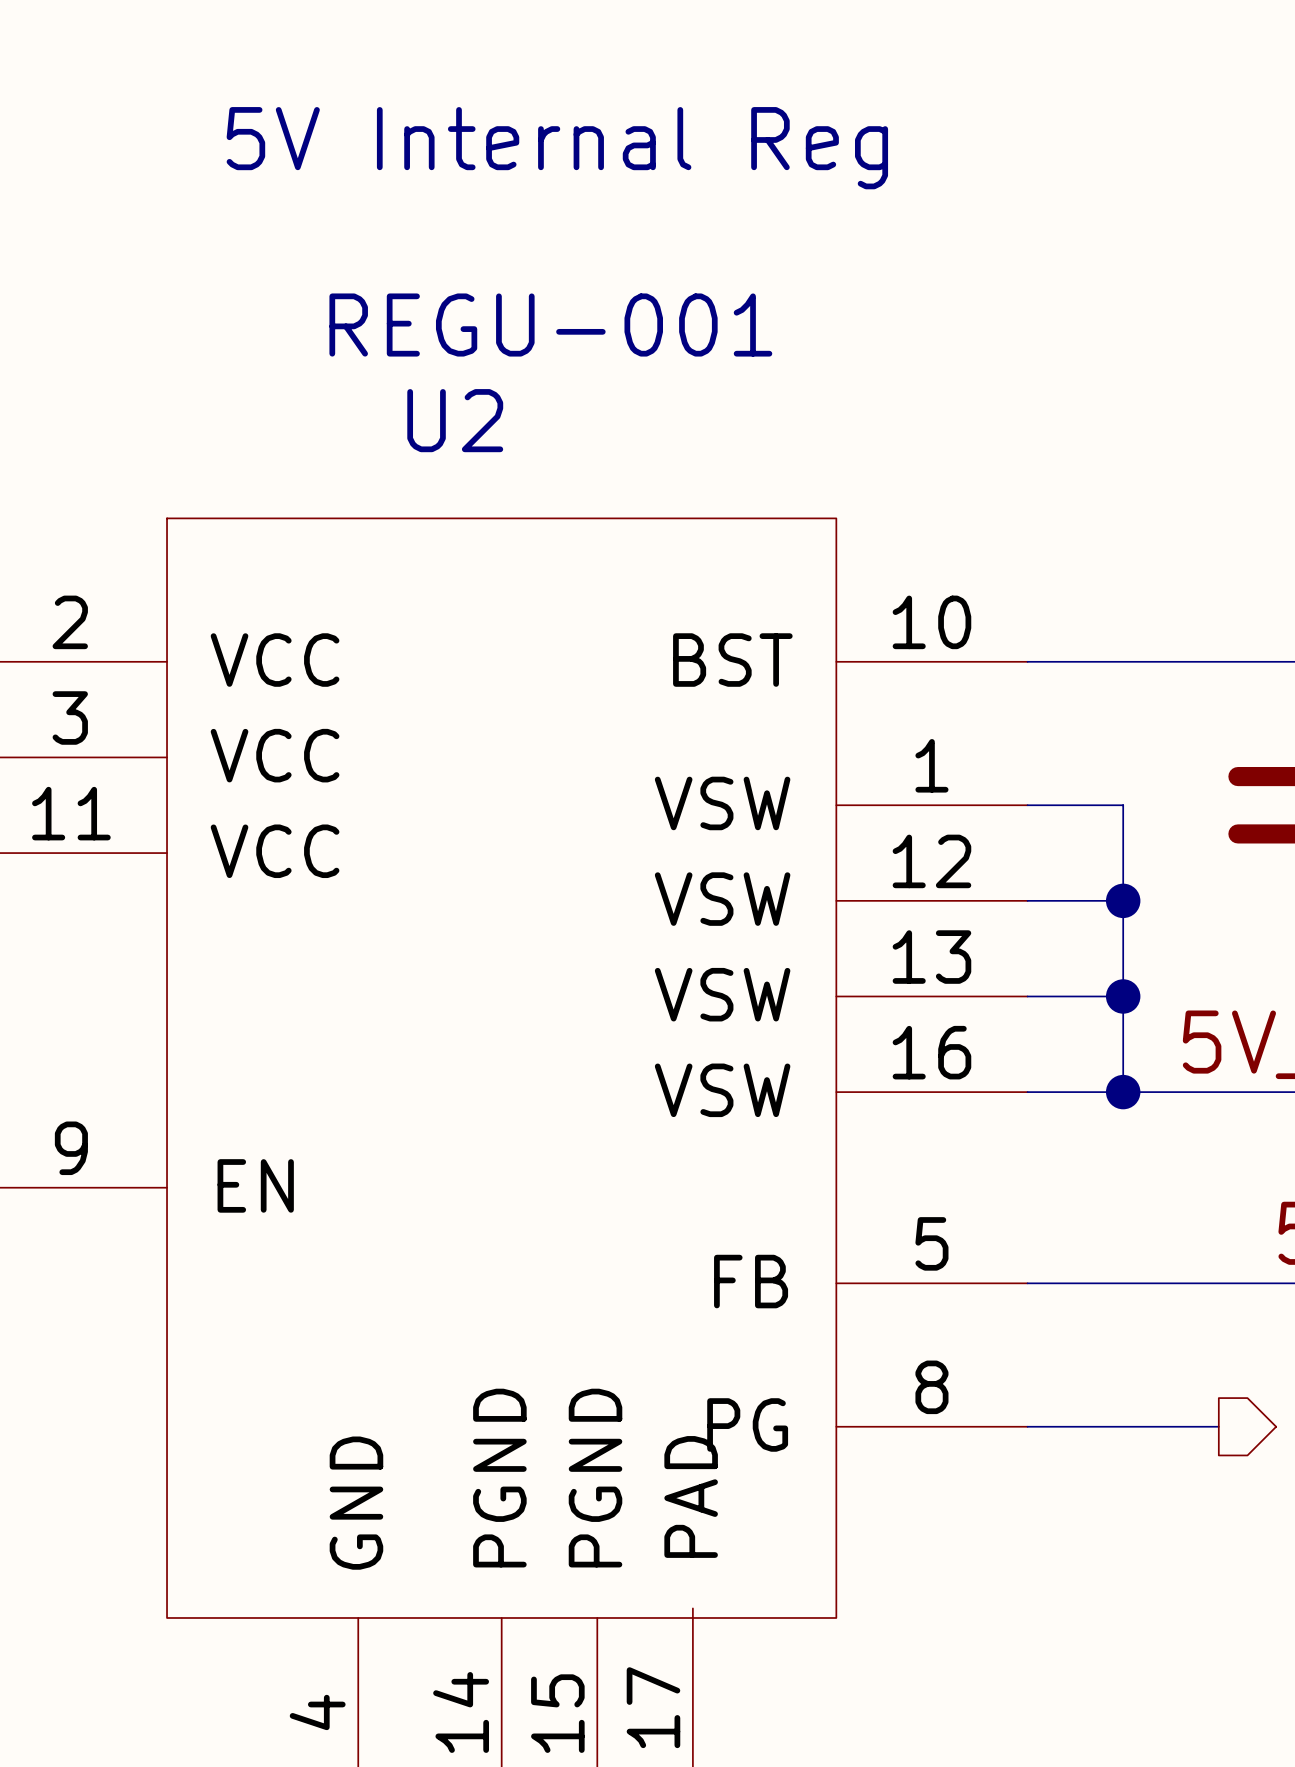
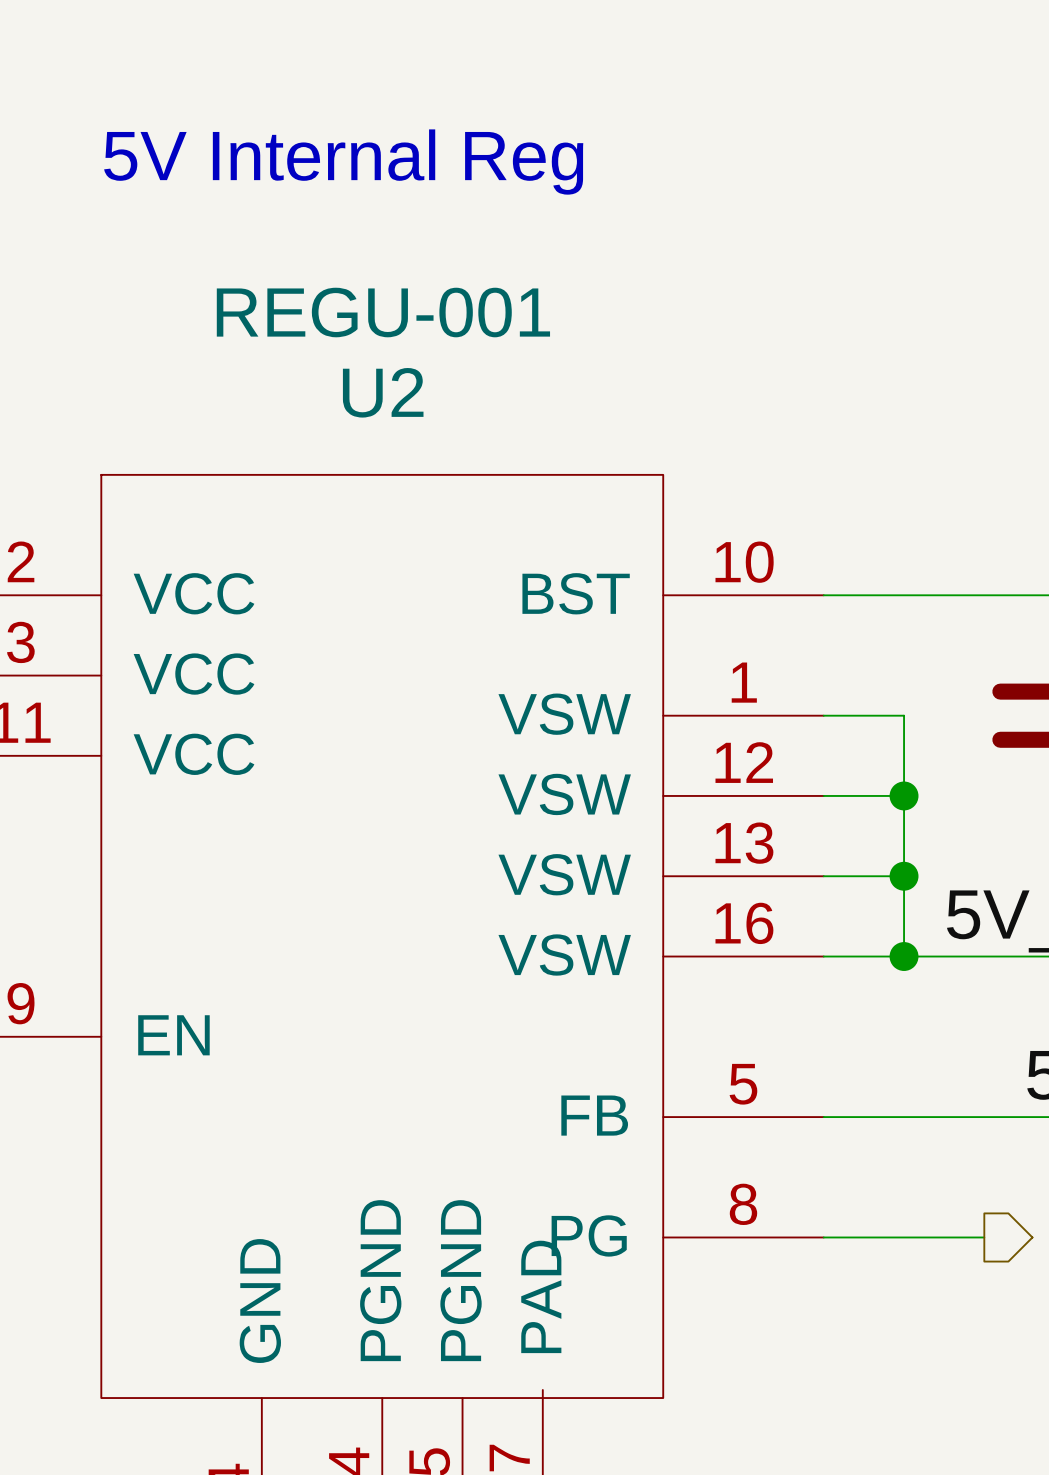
text position: 5V Internal Reg (557, 148) -> 5V Internal Reg (343, 162)
U2 text position: REGU-001 (550, 325) -> REGU-001 (383, 312)
U2 name position: U2 (455, 420) -> U2 (383, 392)

